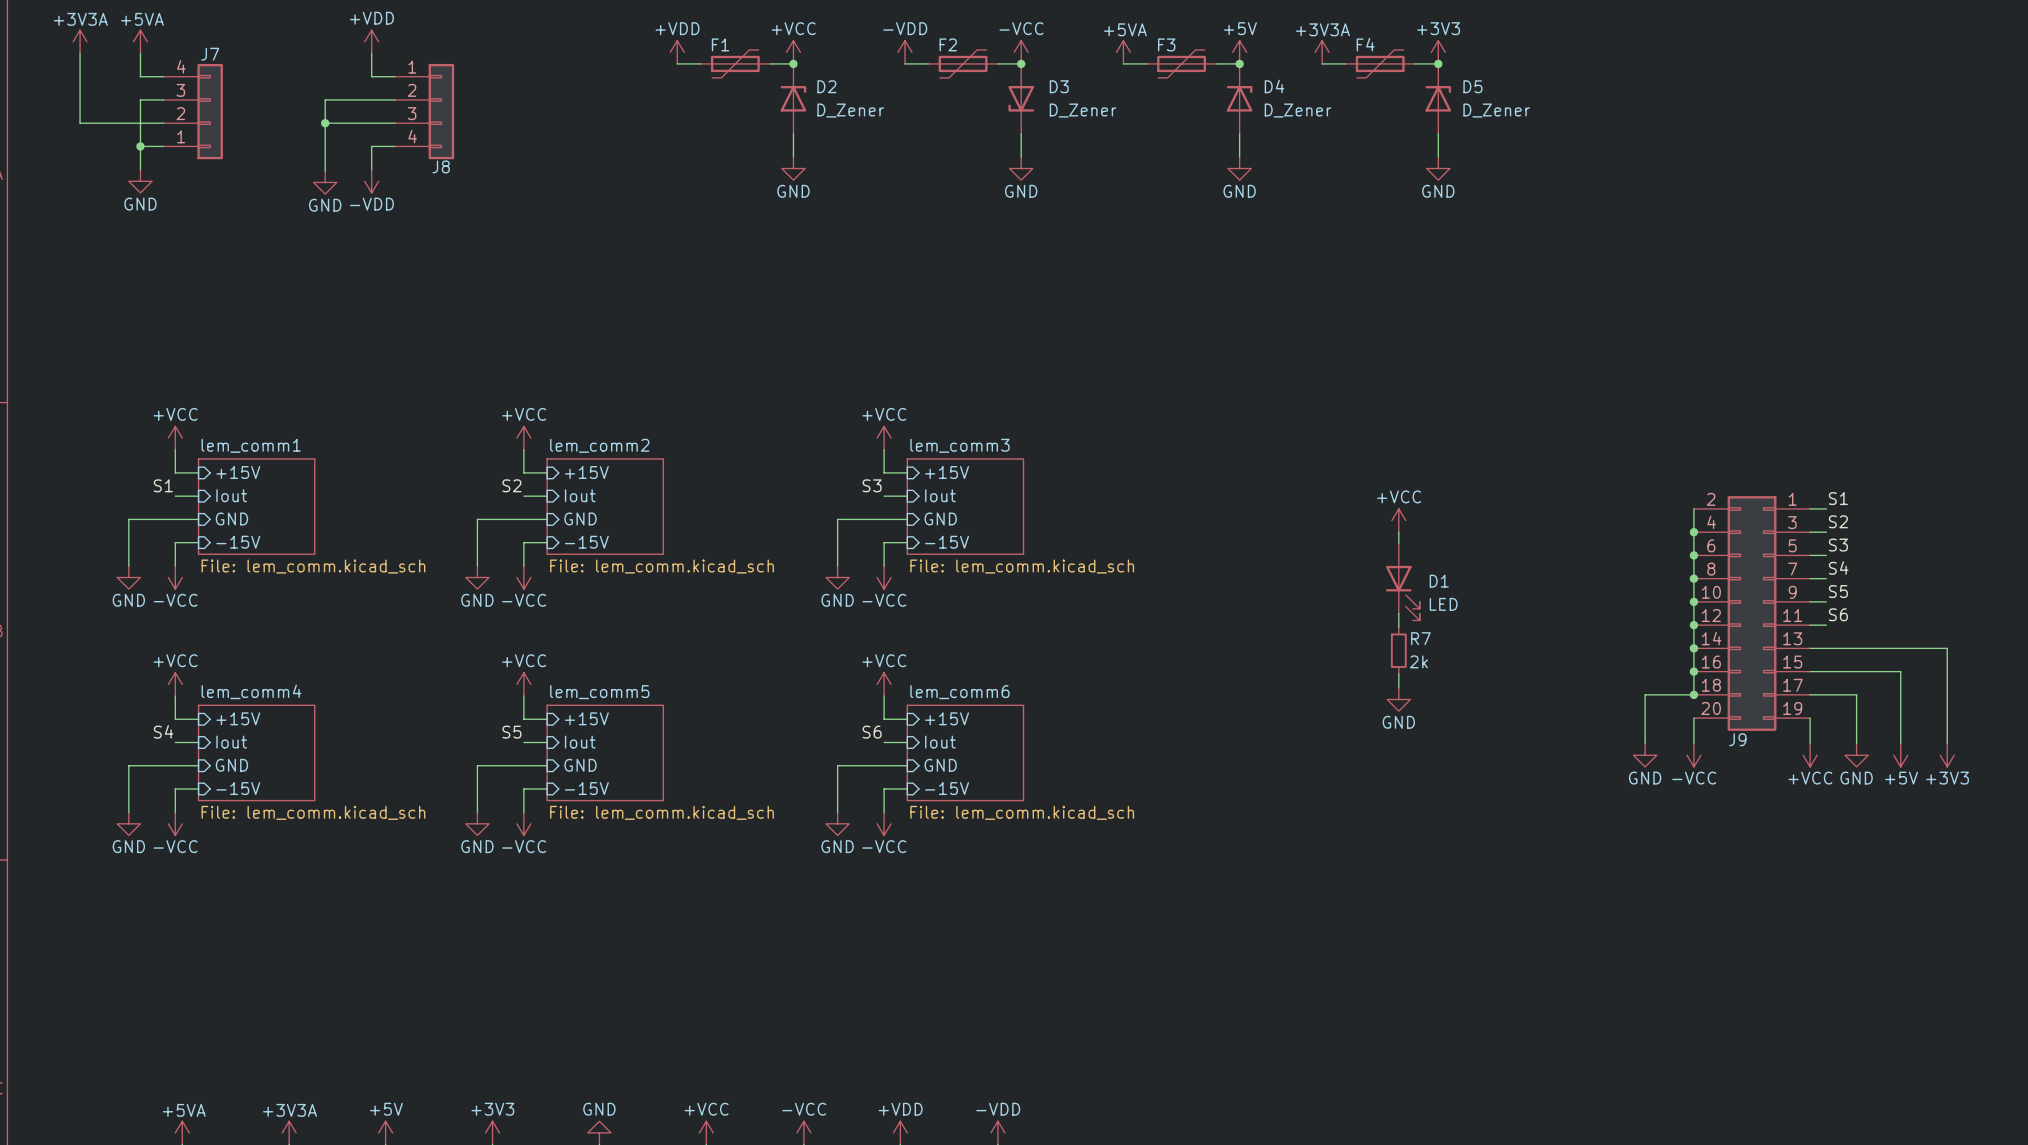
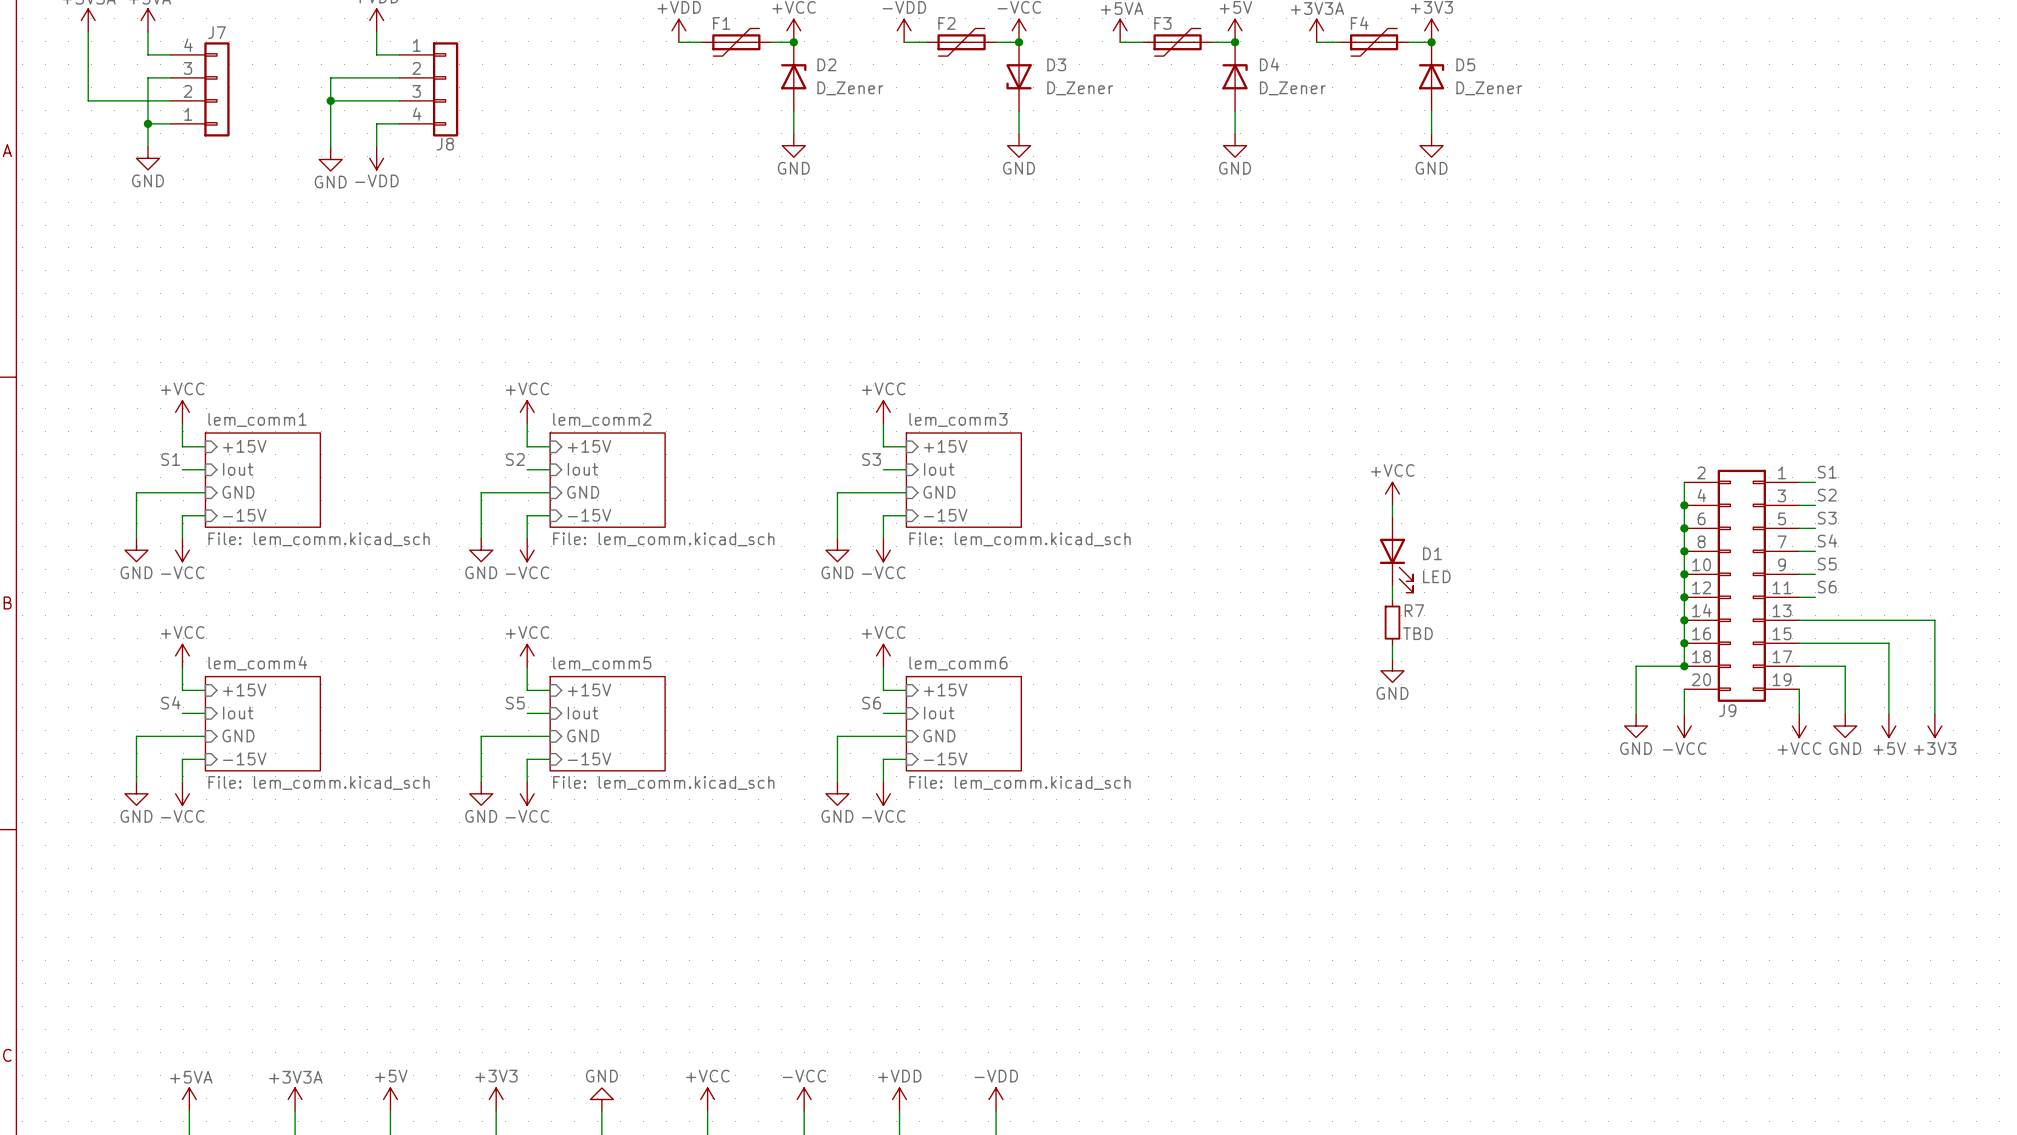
R7 value: 2k (1418, 661) -> TBD (1417, 633)

